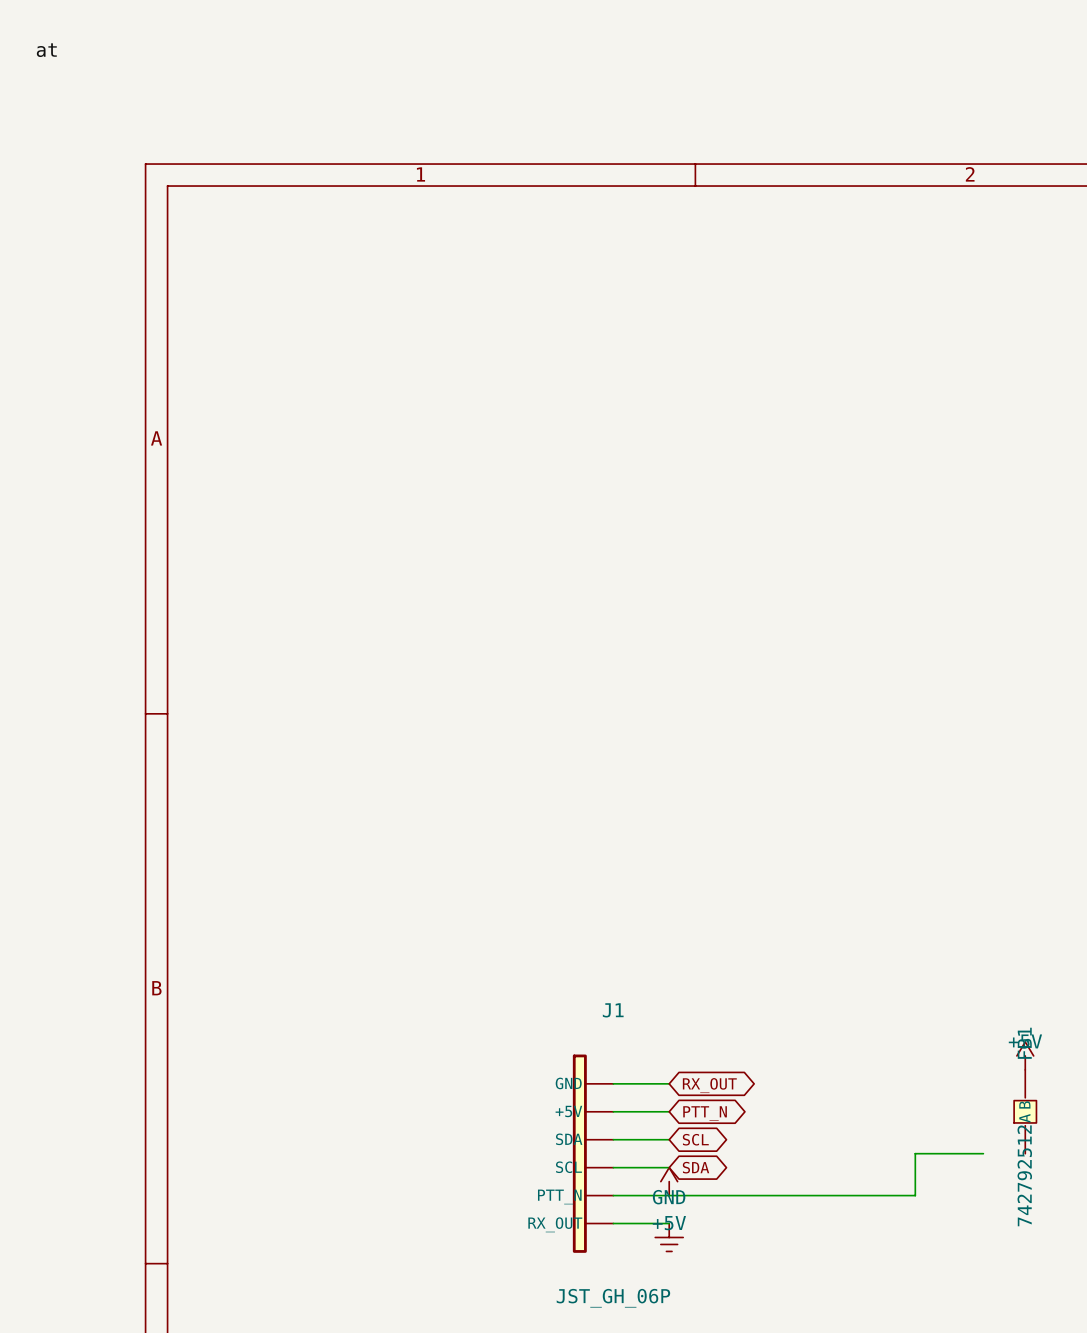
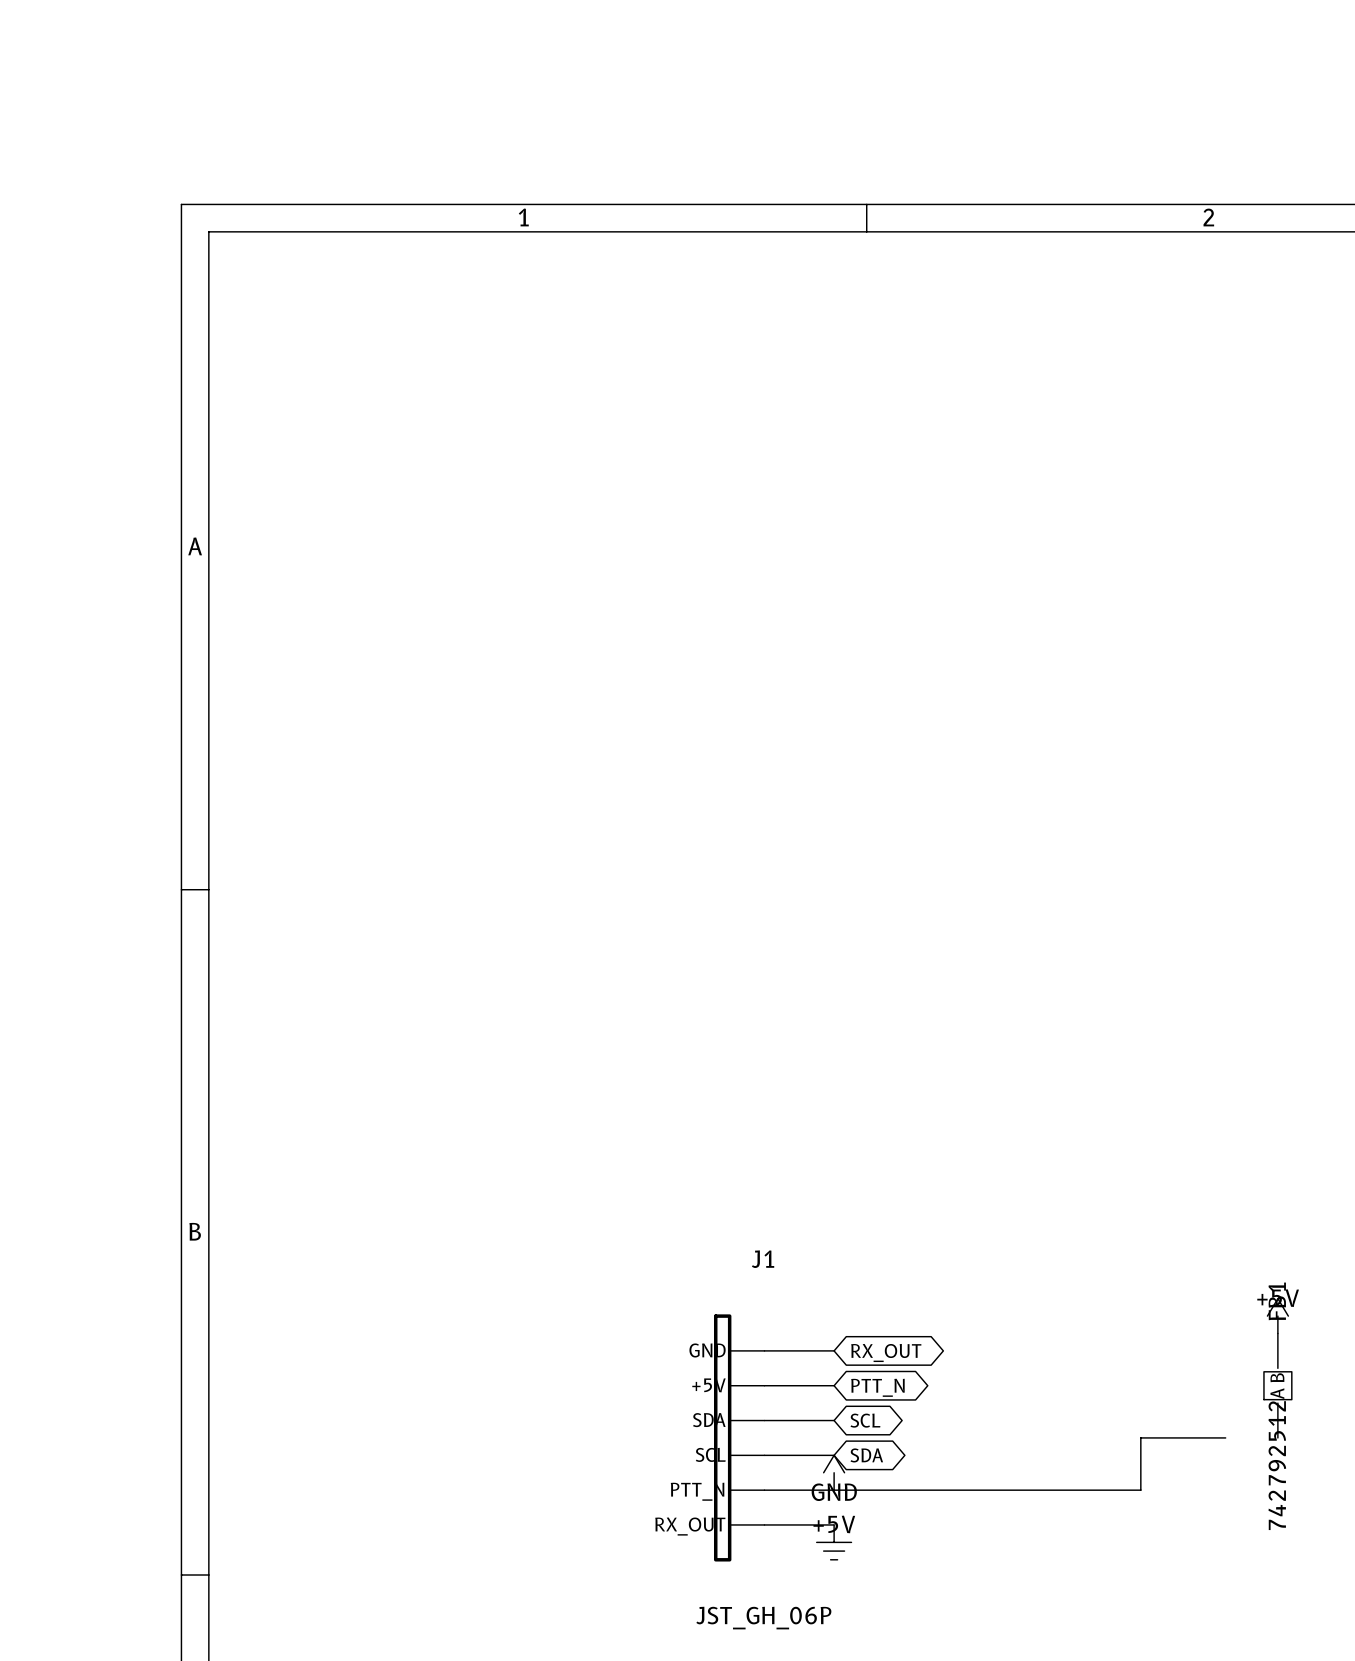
label: at (46, 50) -> none

